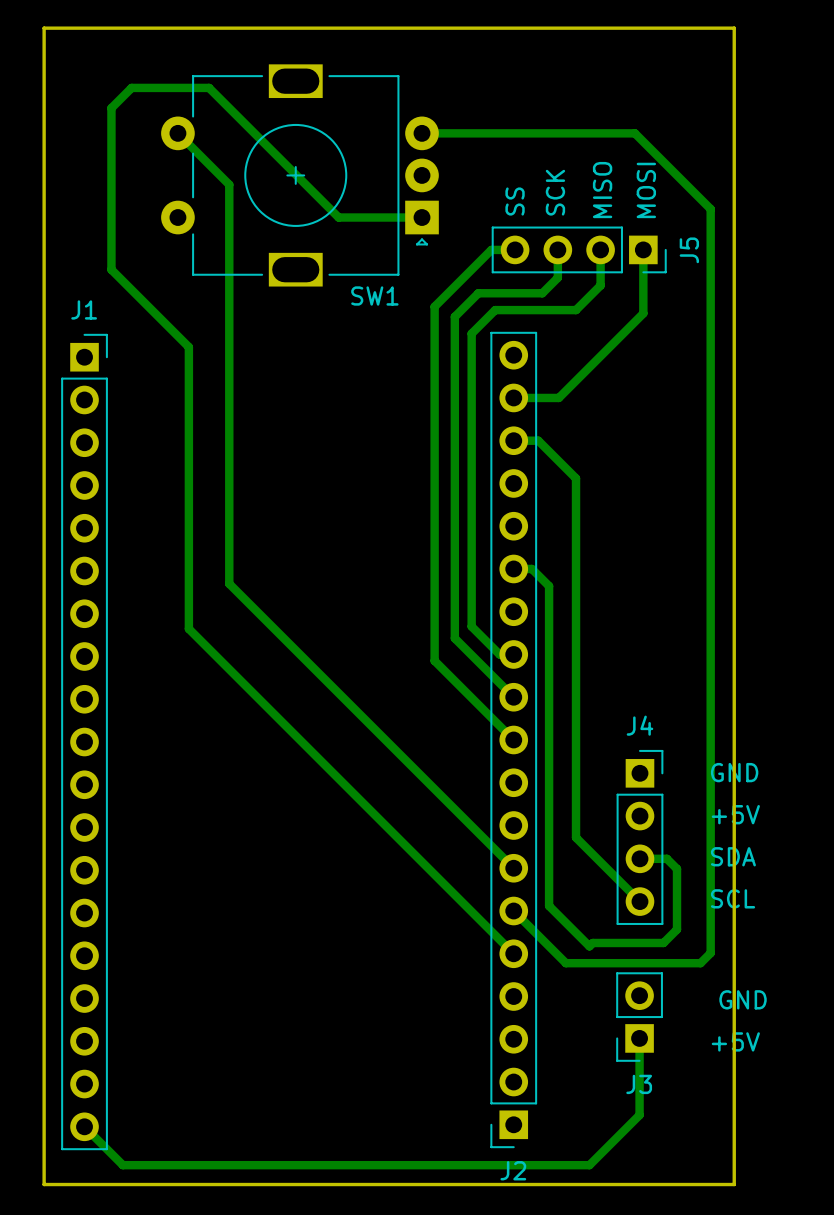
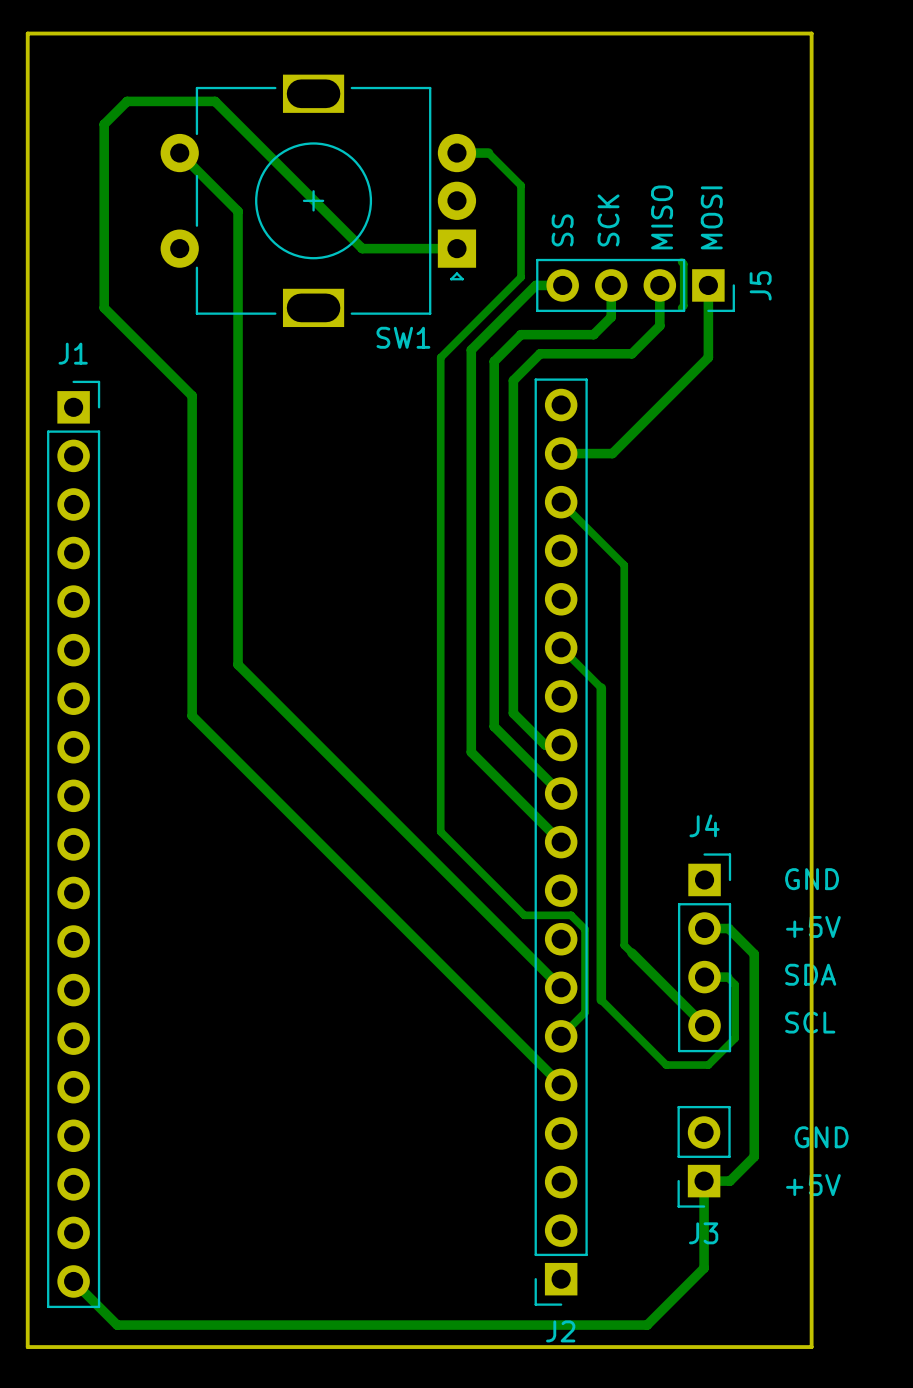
bottom track: (449, 133) (634, 133) (710, 209) (710, 953) (700, 963) (565, 963) (513, 911) -> (488, 153) (521, 185) (521, 277) (440, 357) (440, 831) (524, 915) (571, 915) (585, 929) (585, 1012) (561, 1036)
bottom track: none -> (681, 262) (683, 264) (683, 305) (681, 307)
bottom track: (513, 440) (538, 440) (576, 478) (576, 837) -> (561, 502) (624, 565) (624, 945) (631, 953)
bottom track: (513, 568) (531, 568) (549, 586) (549, 604) -> (561, 647) (601, 688)
bottom track: none -> (704, 928) (728, 928) (754, 954) (754, 1156) (729, 1181) (704, 1181)
bottom track: (660, 858) (666, 858) (677, 868) (677, 929) (663, 942) (592, 942) (589, 946) (549, 905) (549, 879) -> (727, 977) (735, 984) (735, 1038) (708, 1065) (666, 1065) (601, 1000)

